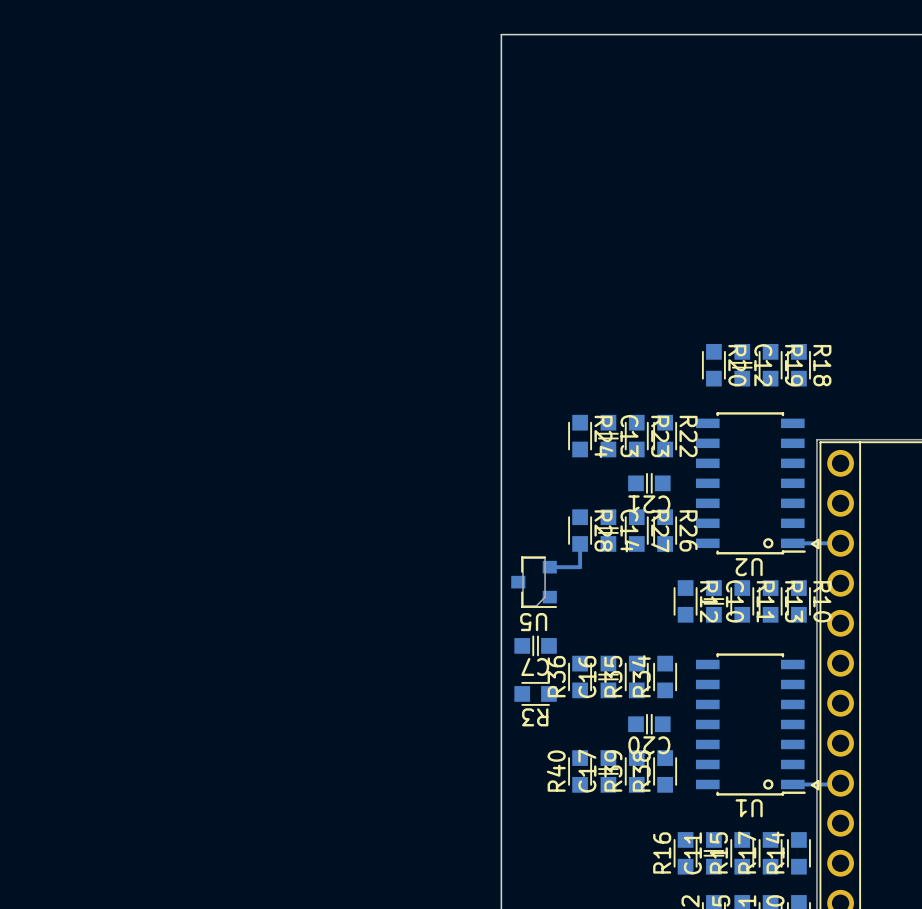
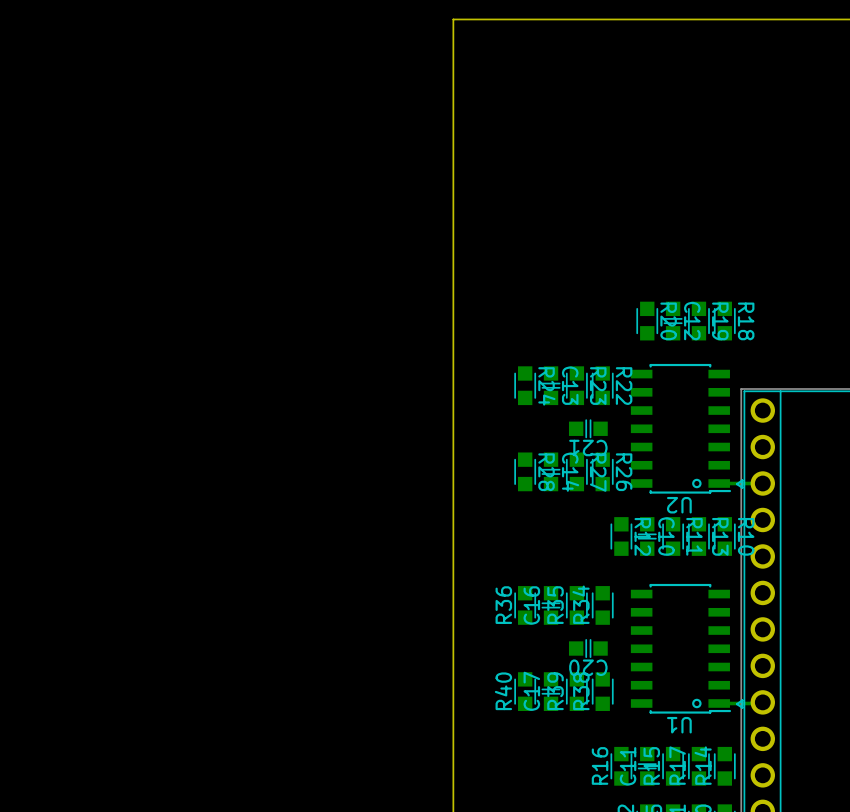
track: (580, 543) (580, 567) (549, 567) -> none
U5: (534, 582) -> none
C7: (535, 645) -> none
R3: (535, 693) -> none

